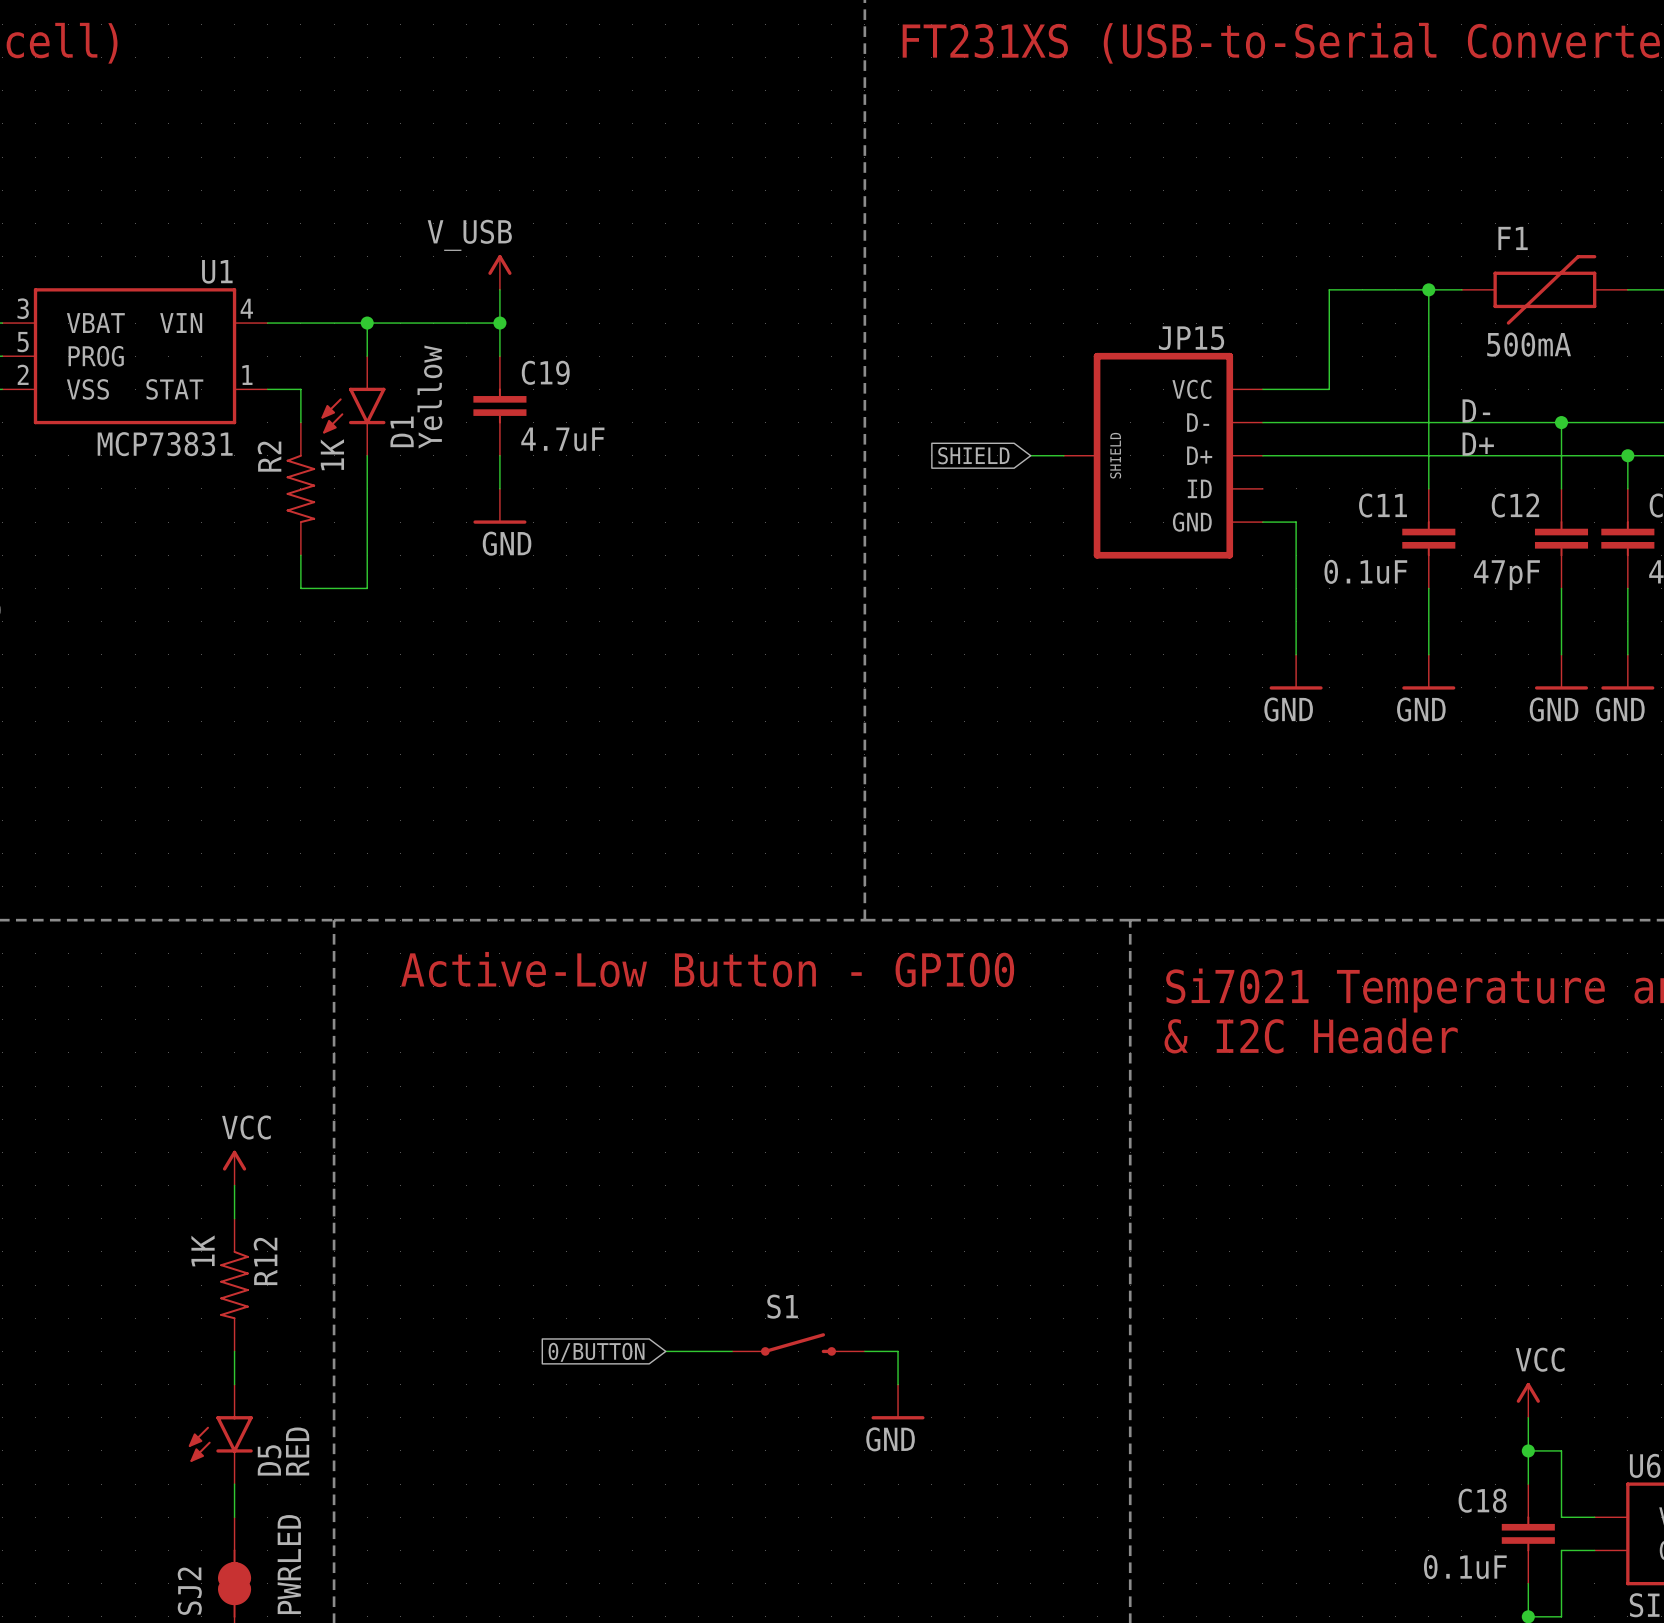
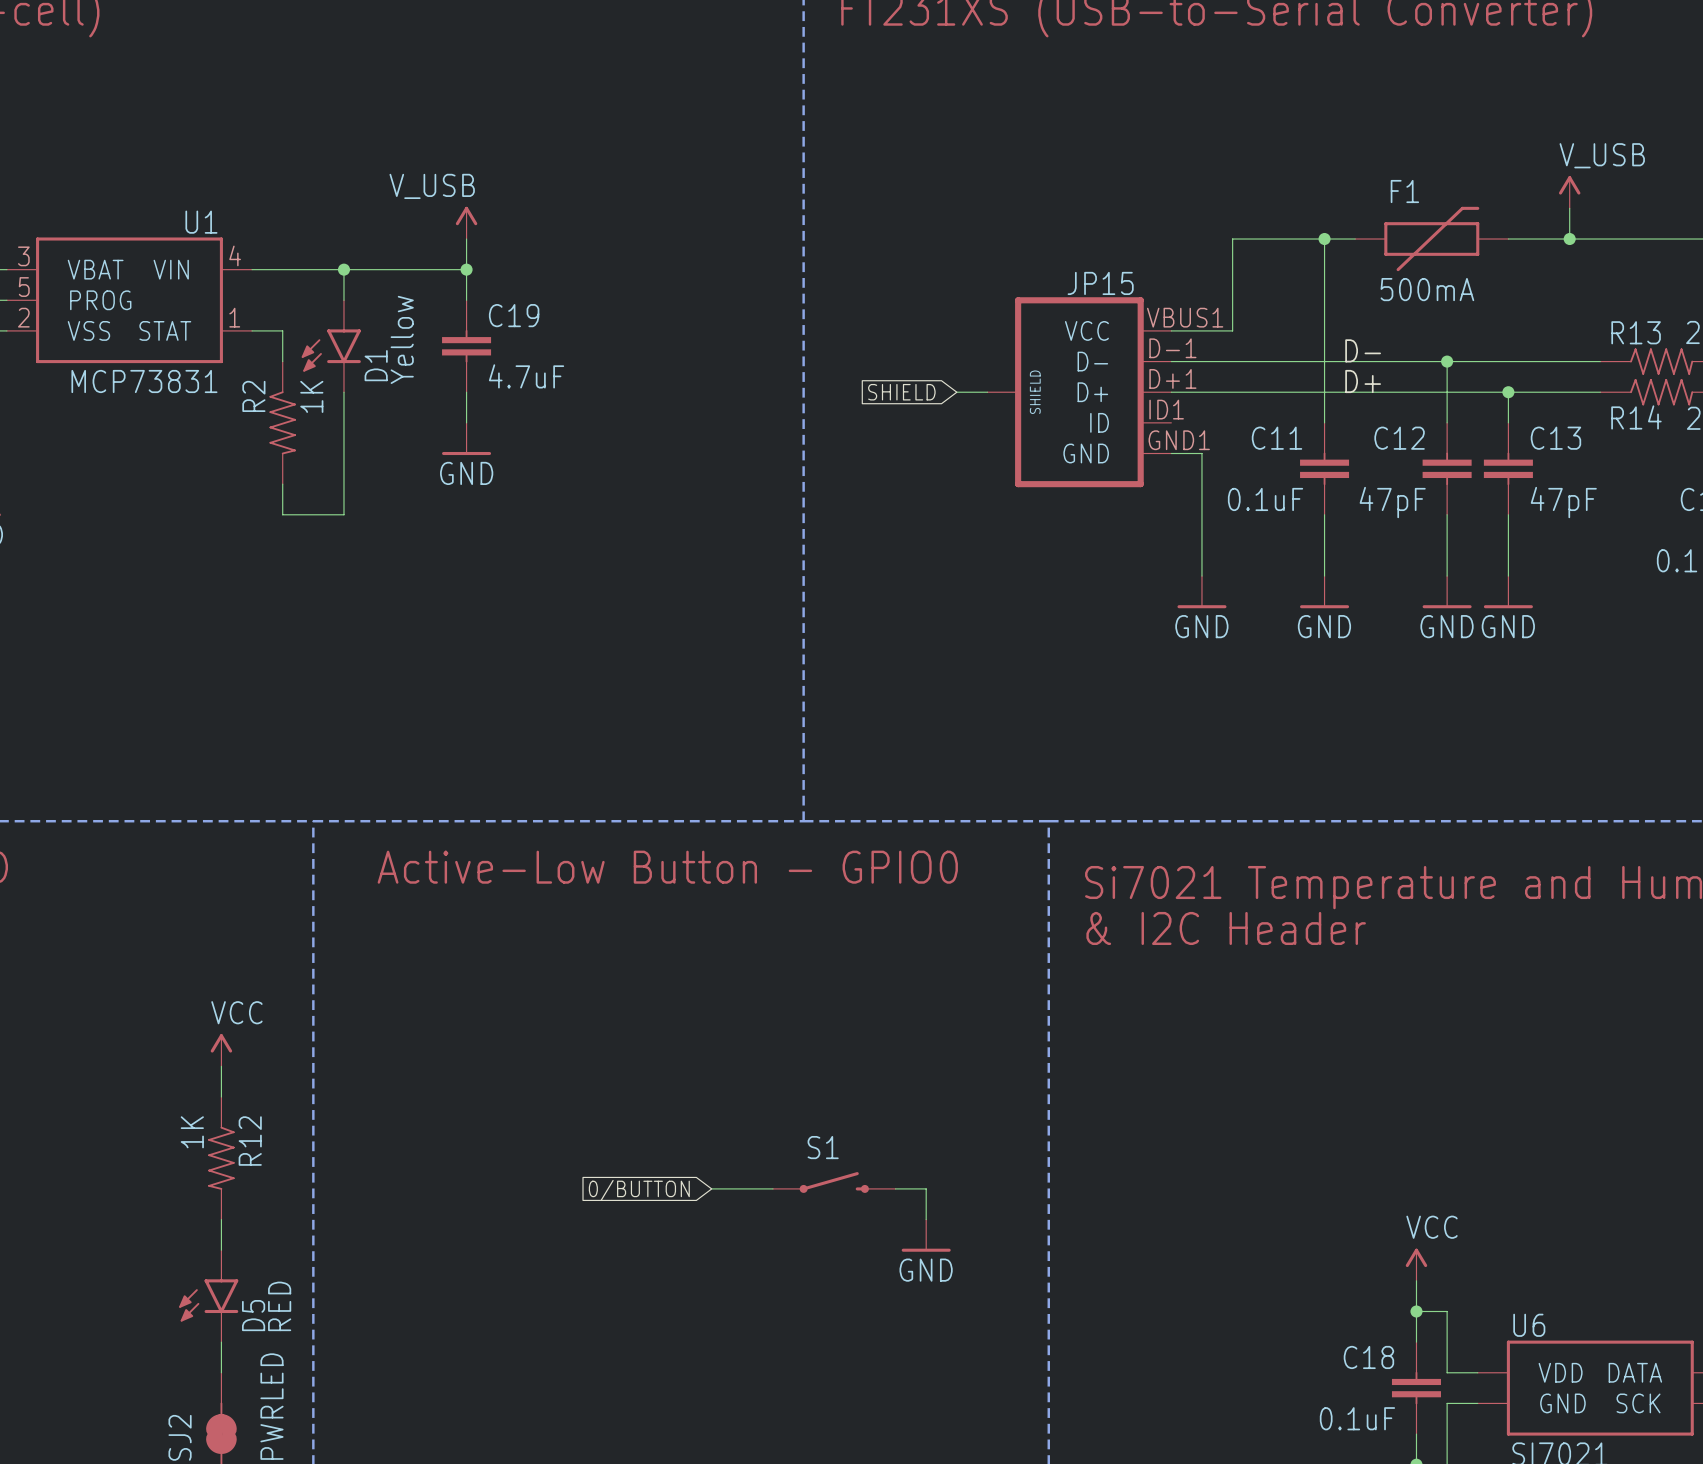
JP15 symbol: [1063, 352, 1263, 559] -> [987, 297, 1172, 488]
S1 position: (798, 1344) -> (834, 1182)
wire: (665, 1351) (732, 1351) -> (711, 1188) (772, 1188)
wire: (864, 1351) (898, 1351) (898, 1384) -> (895, 1188) (926, 1188) (926, 1219)
global label position: 0/BUTTON (596, 1352) -> 0/BUTTON (639, 1190)
power symbol position: GND (898, 1402) -> GND (926, 1235)

